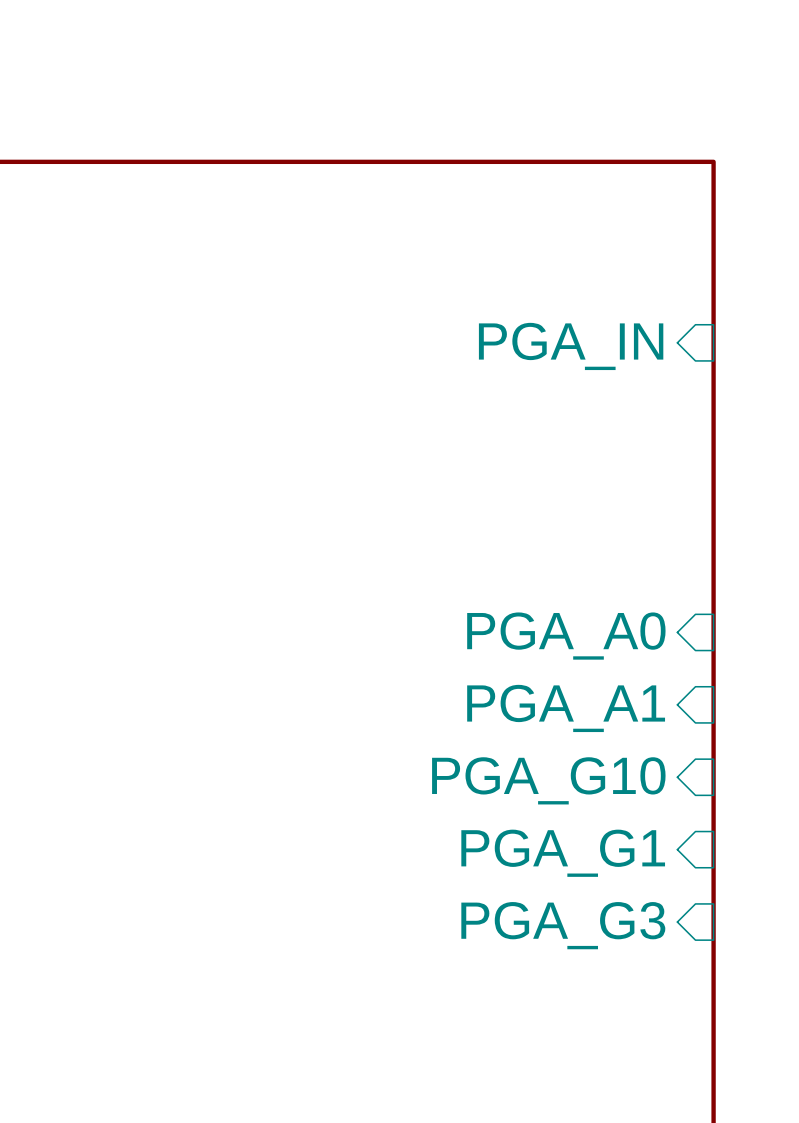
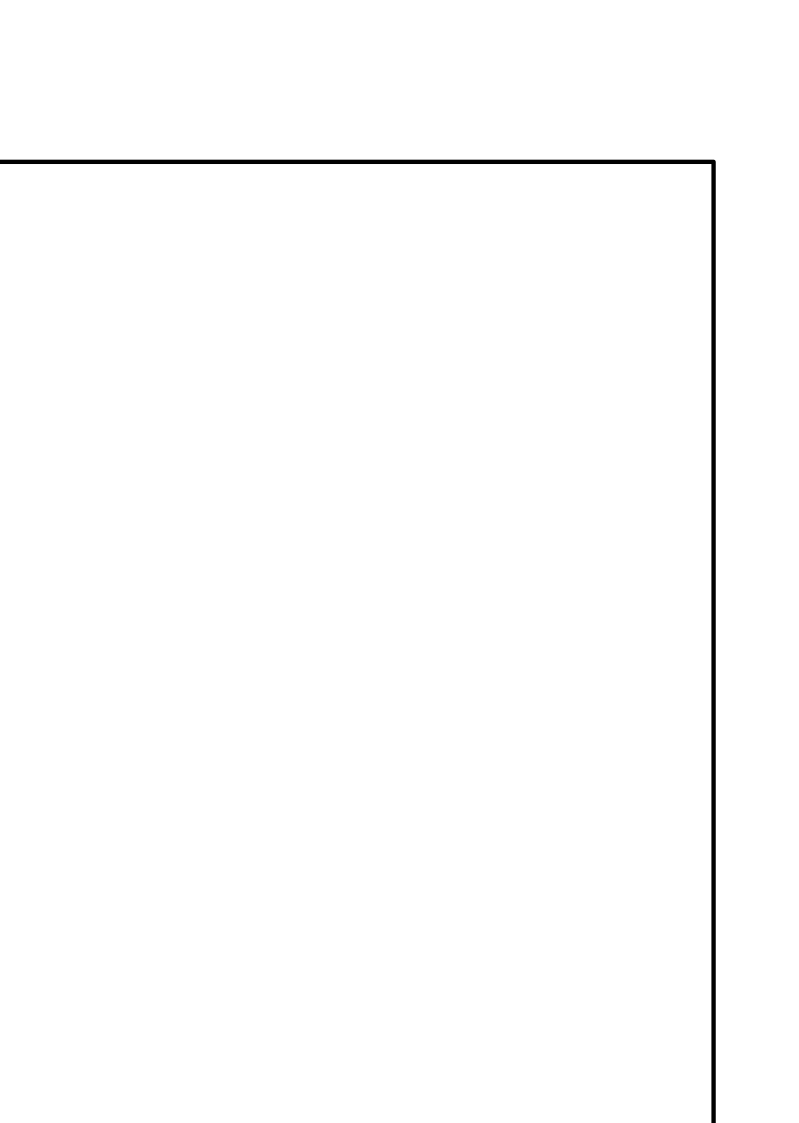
sheet pin: PGA_IN (571, 346) -> none
sheet pin: PGA_A0 (566, 636) -> none
sheet pin: PGA_A1 (566, 708) -> none
sheet pin: PGA_G10 (548, 780) -> none
sheet pin: PGA_G1 (563, 853) -> none
sheet pin: PGA_G3 (563, 925) -> none

